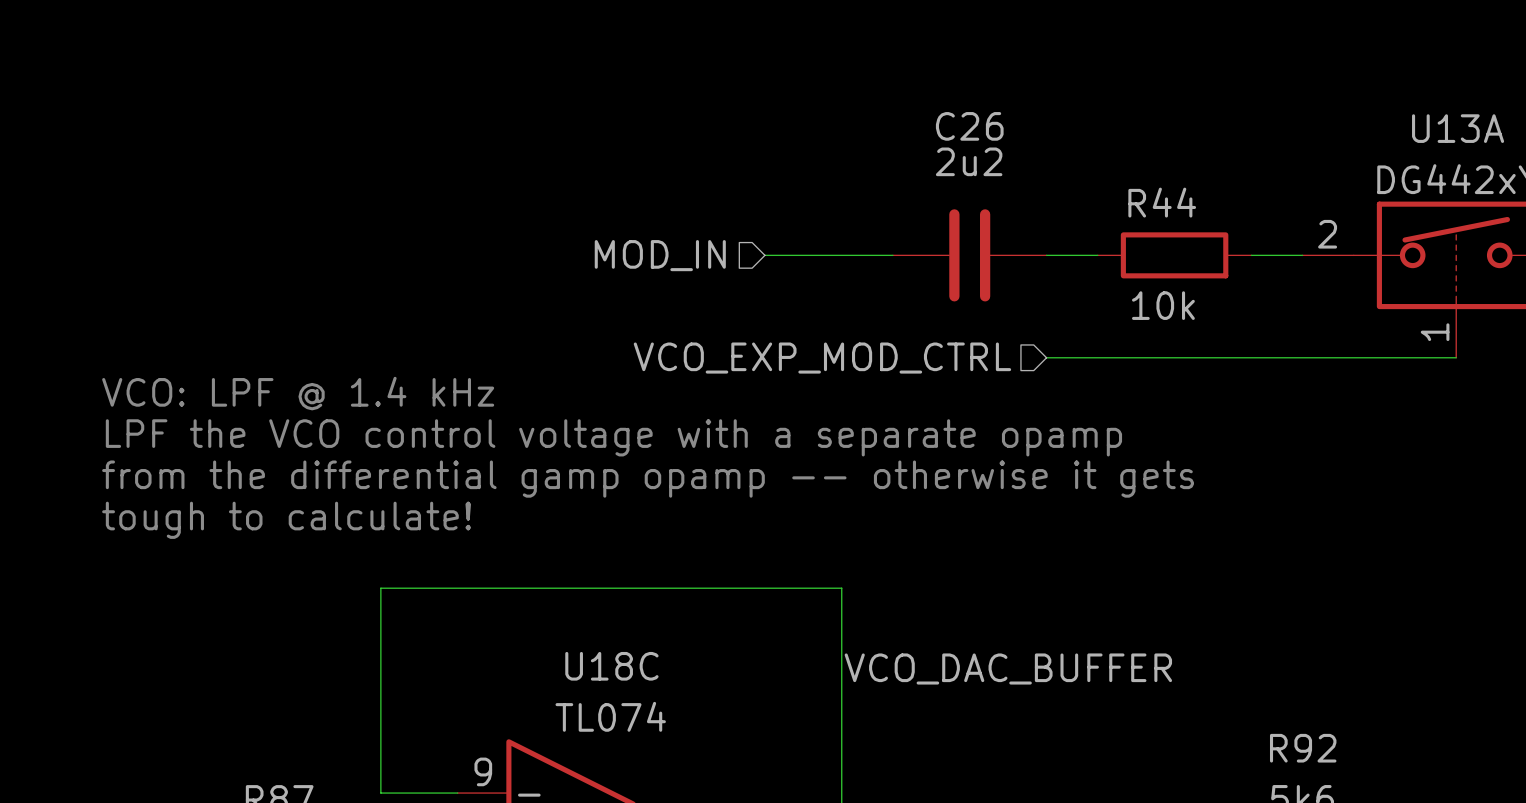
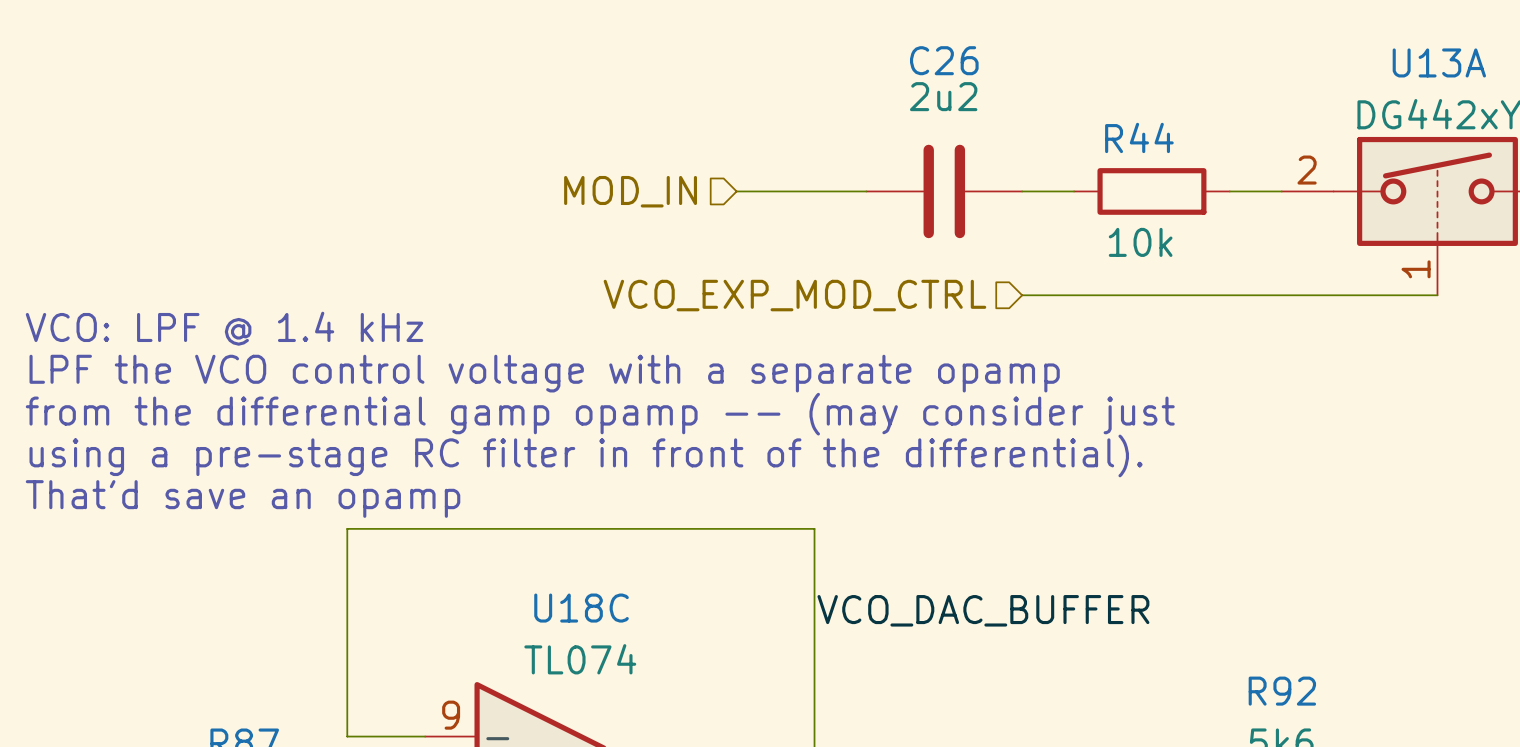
text position: VCO: LPF @ 1.4 kHz (298, 393) -> VCO: LPF @ 1.4 kHz (224, 328)
text position: LPF the VCO control voltage with a separate opamp (613, 437) -> LPF the VCO control voltage with a separate opamp (544, 373)
text: from the differential gamp opamp -- otherwise it gets (648, 479) -> from the differential gamp opamp -- (may consider just (600, 414)
text: none -> using a pre-stage RC filter in front of the differential). (586, 455)
text: tough to calculate! (286, 520) -> none
text: none -> That'd save an opamp (243, 498)

